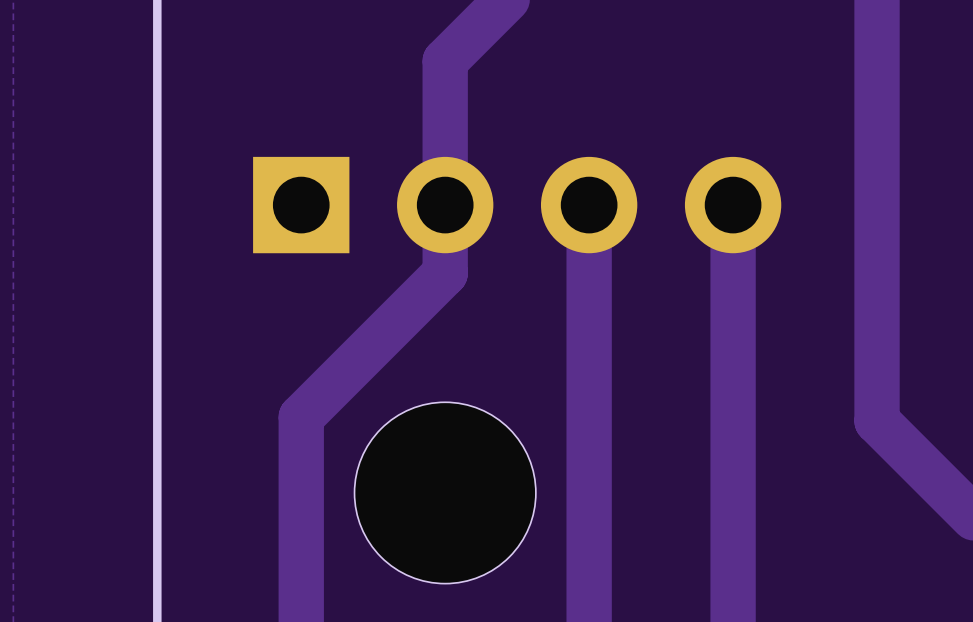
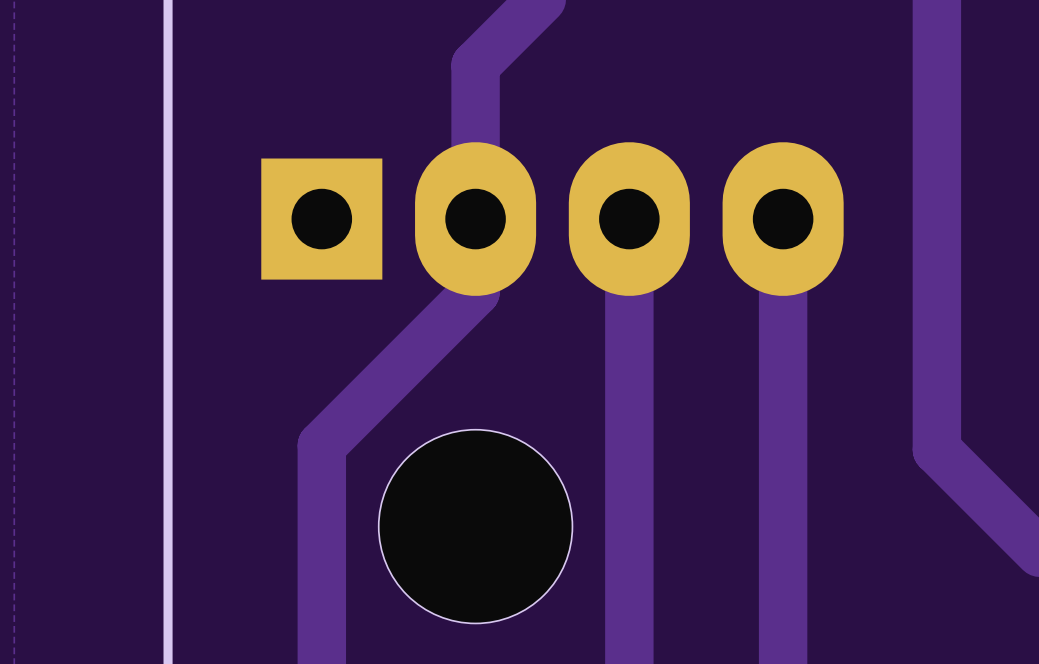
part footprint: [253, 156, 782, 254] -> [261, 142, 844, 296]

